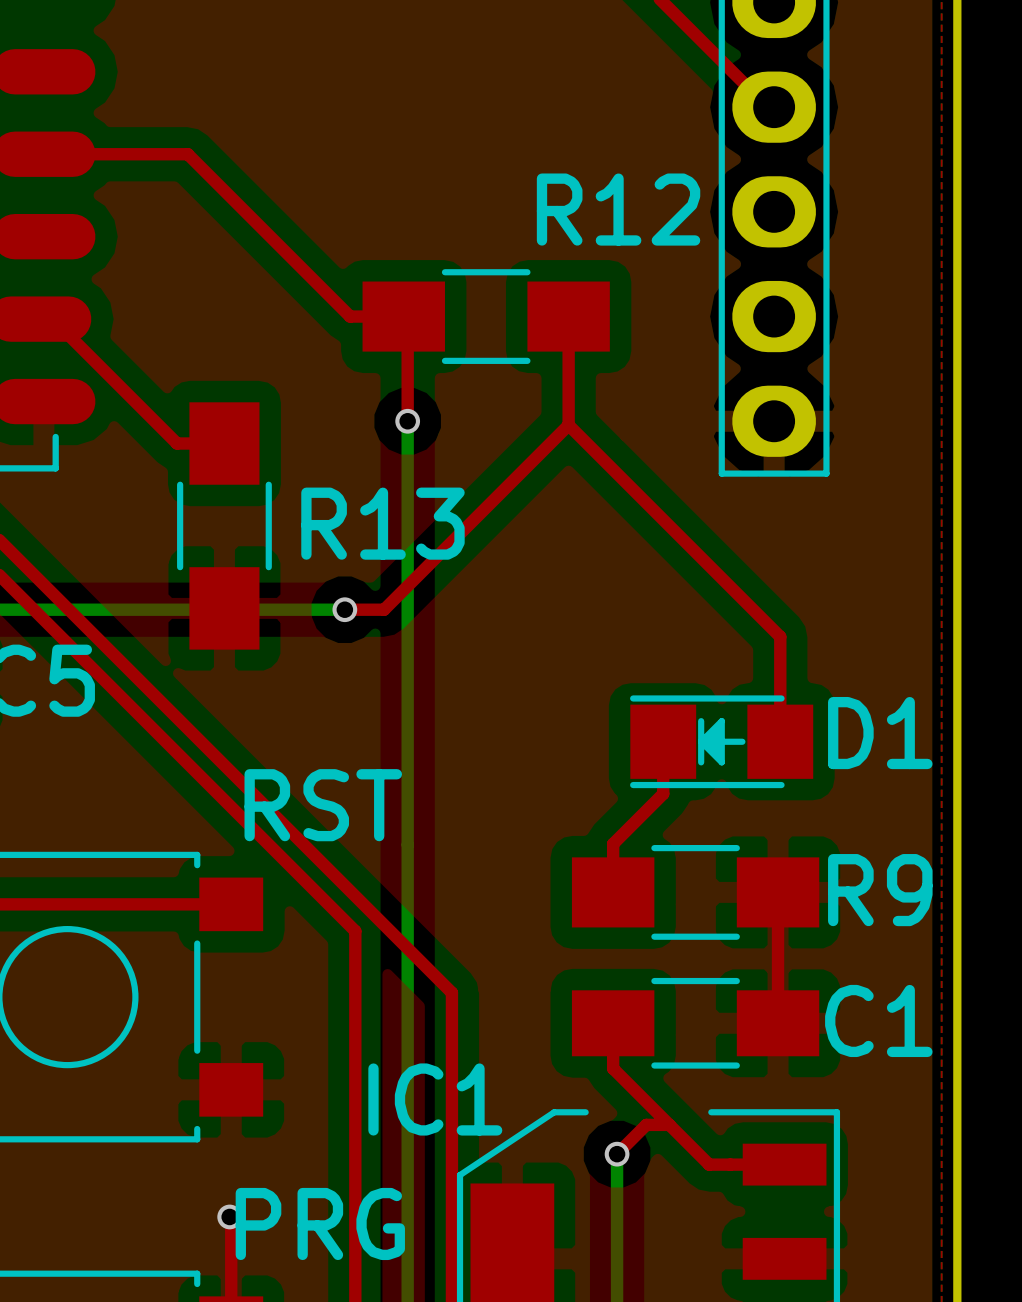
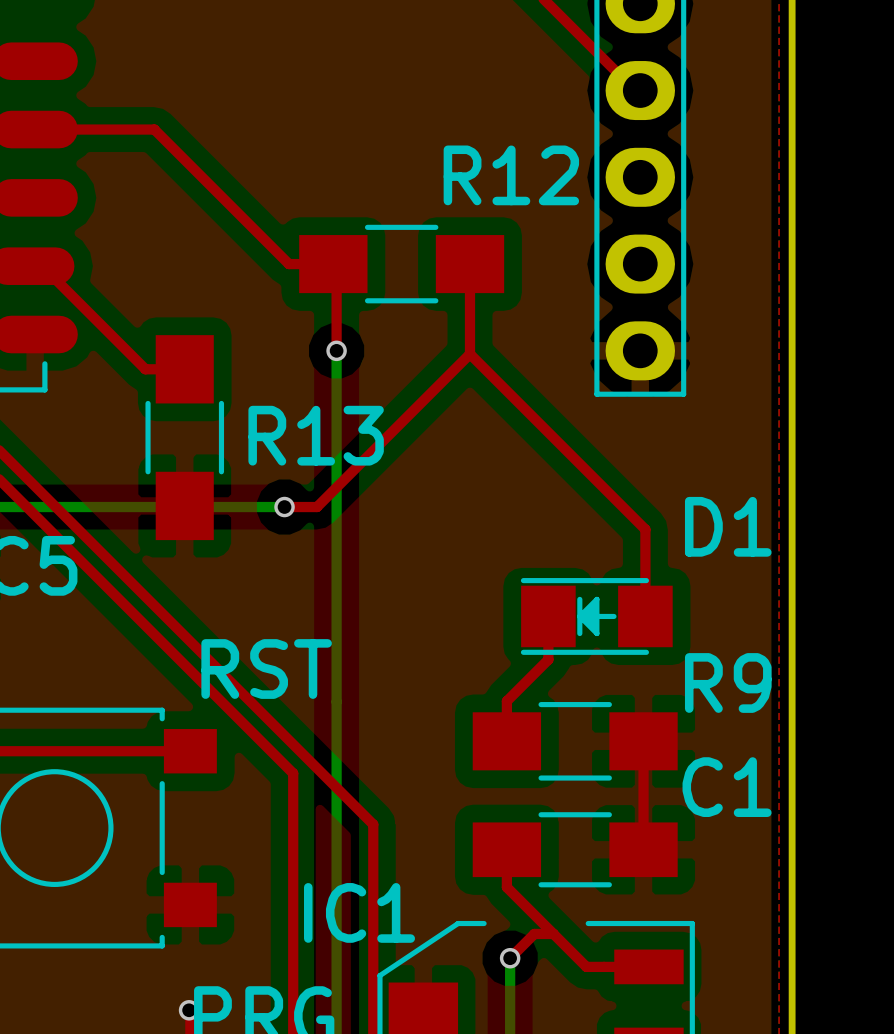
D1 name position: D1 (880, 733) -> D1 (728, 526)
R9 name position: R9 (880, 890) -> R9 (728, 682)
C1 name position: C1 (878, 1020) -> C1 (727, 787)

